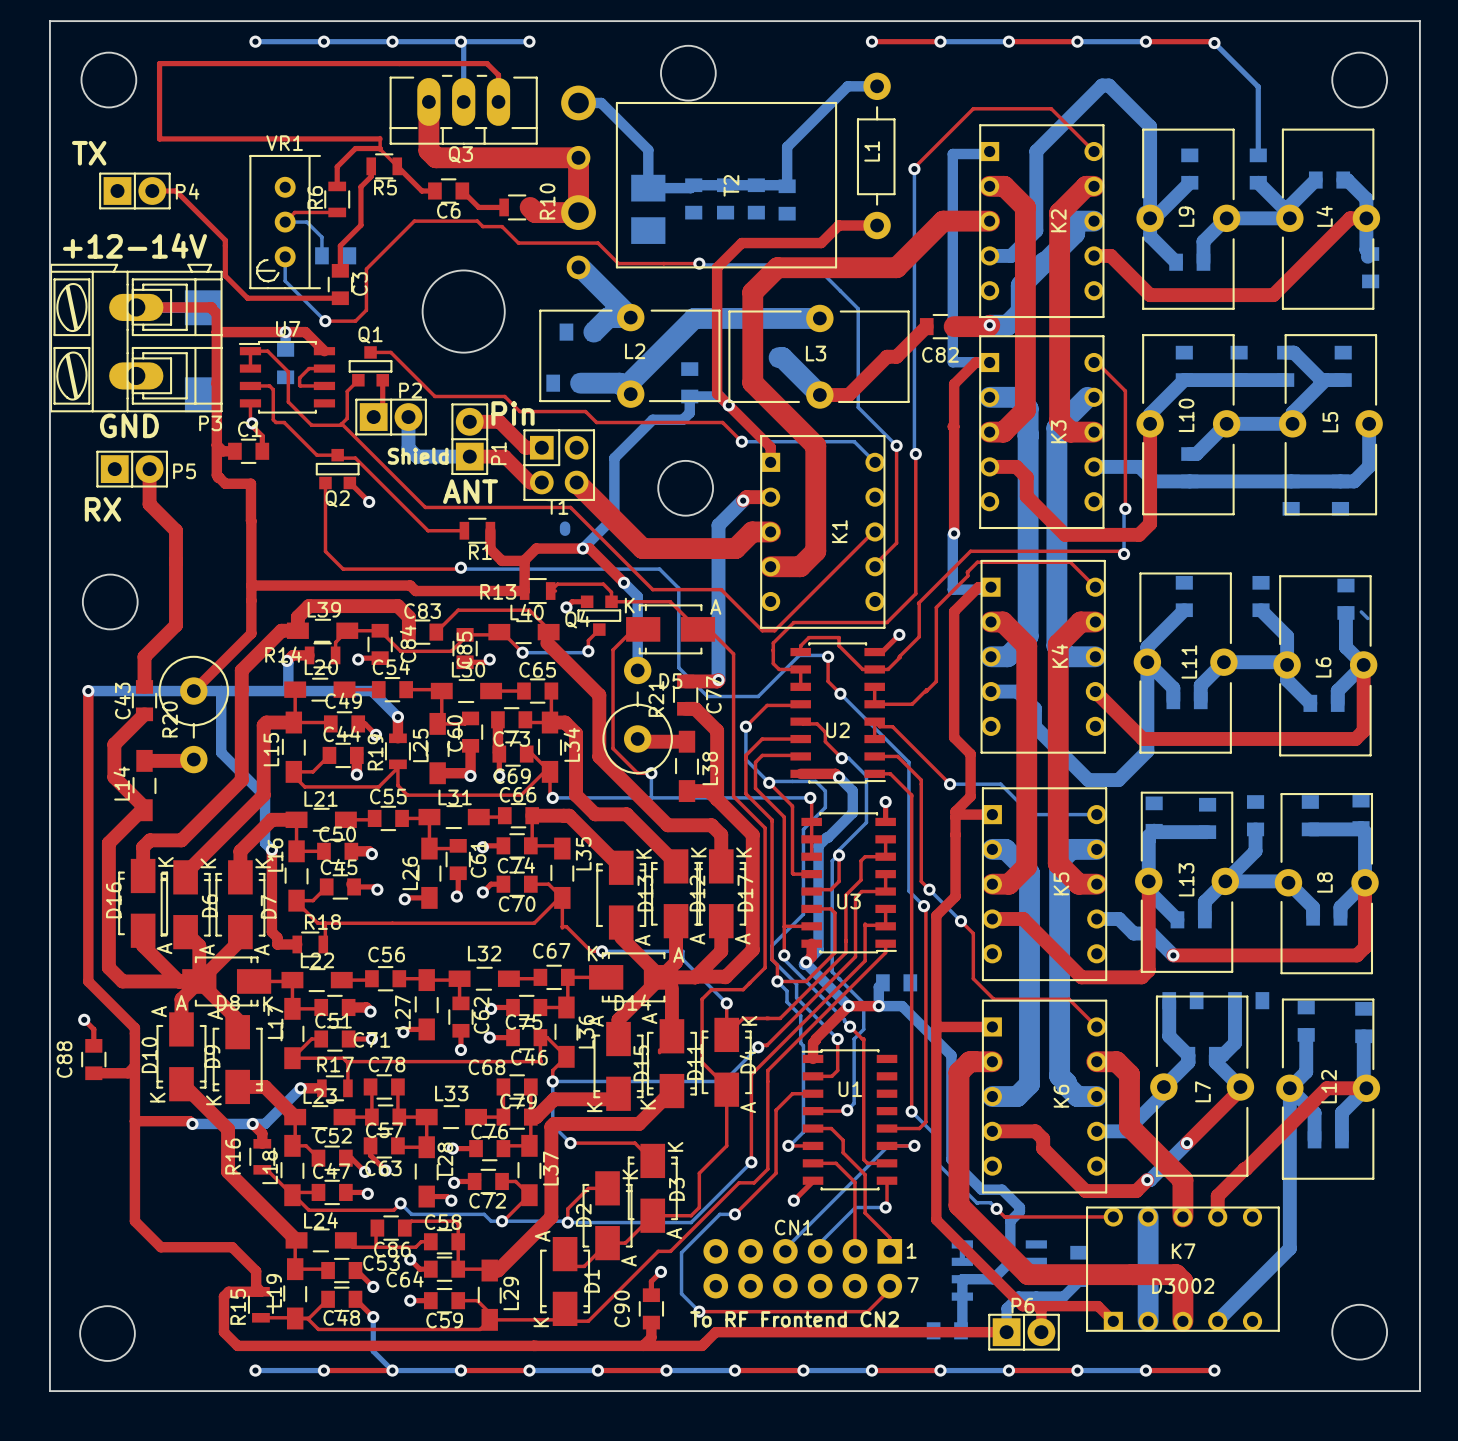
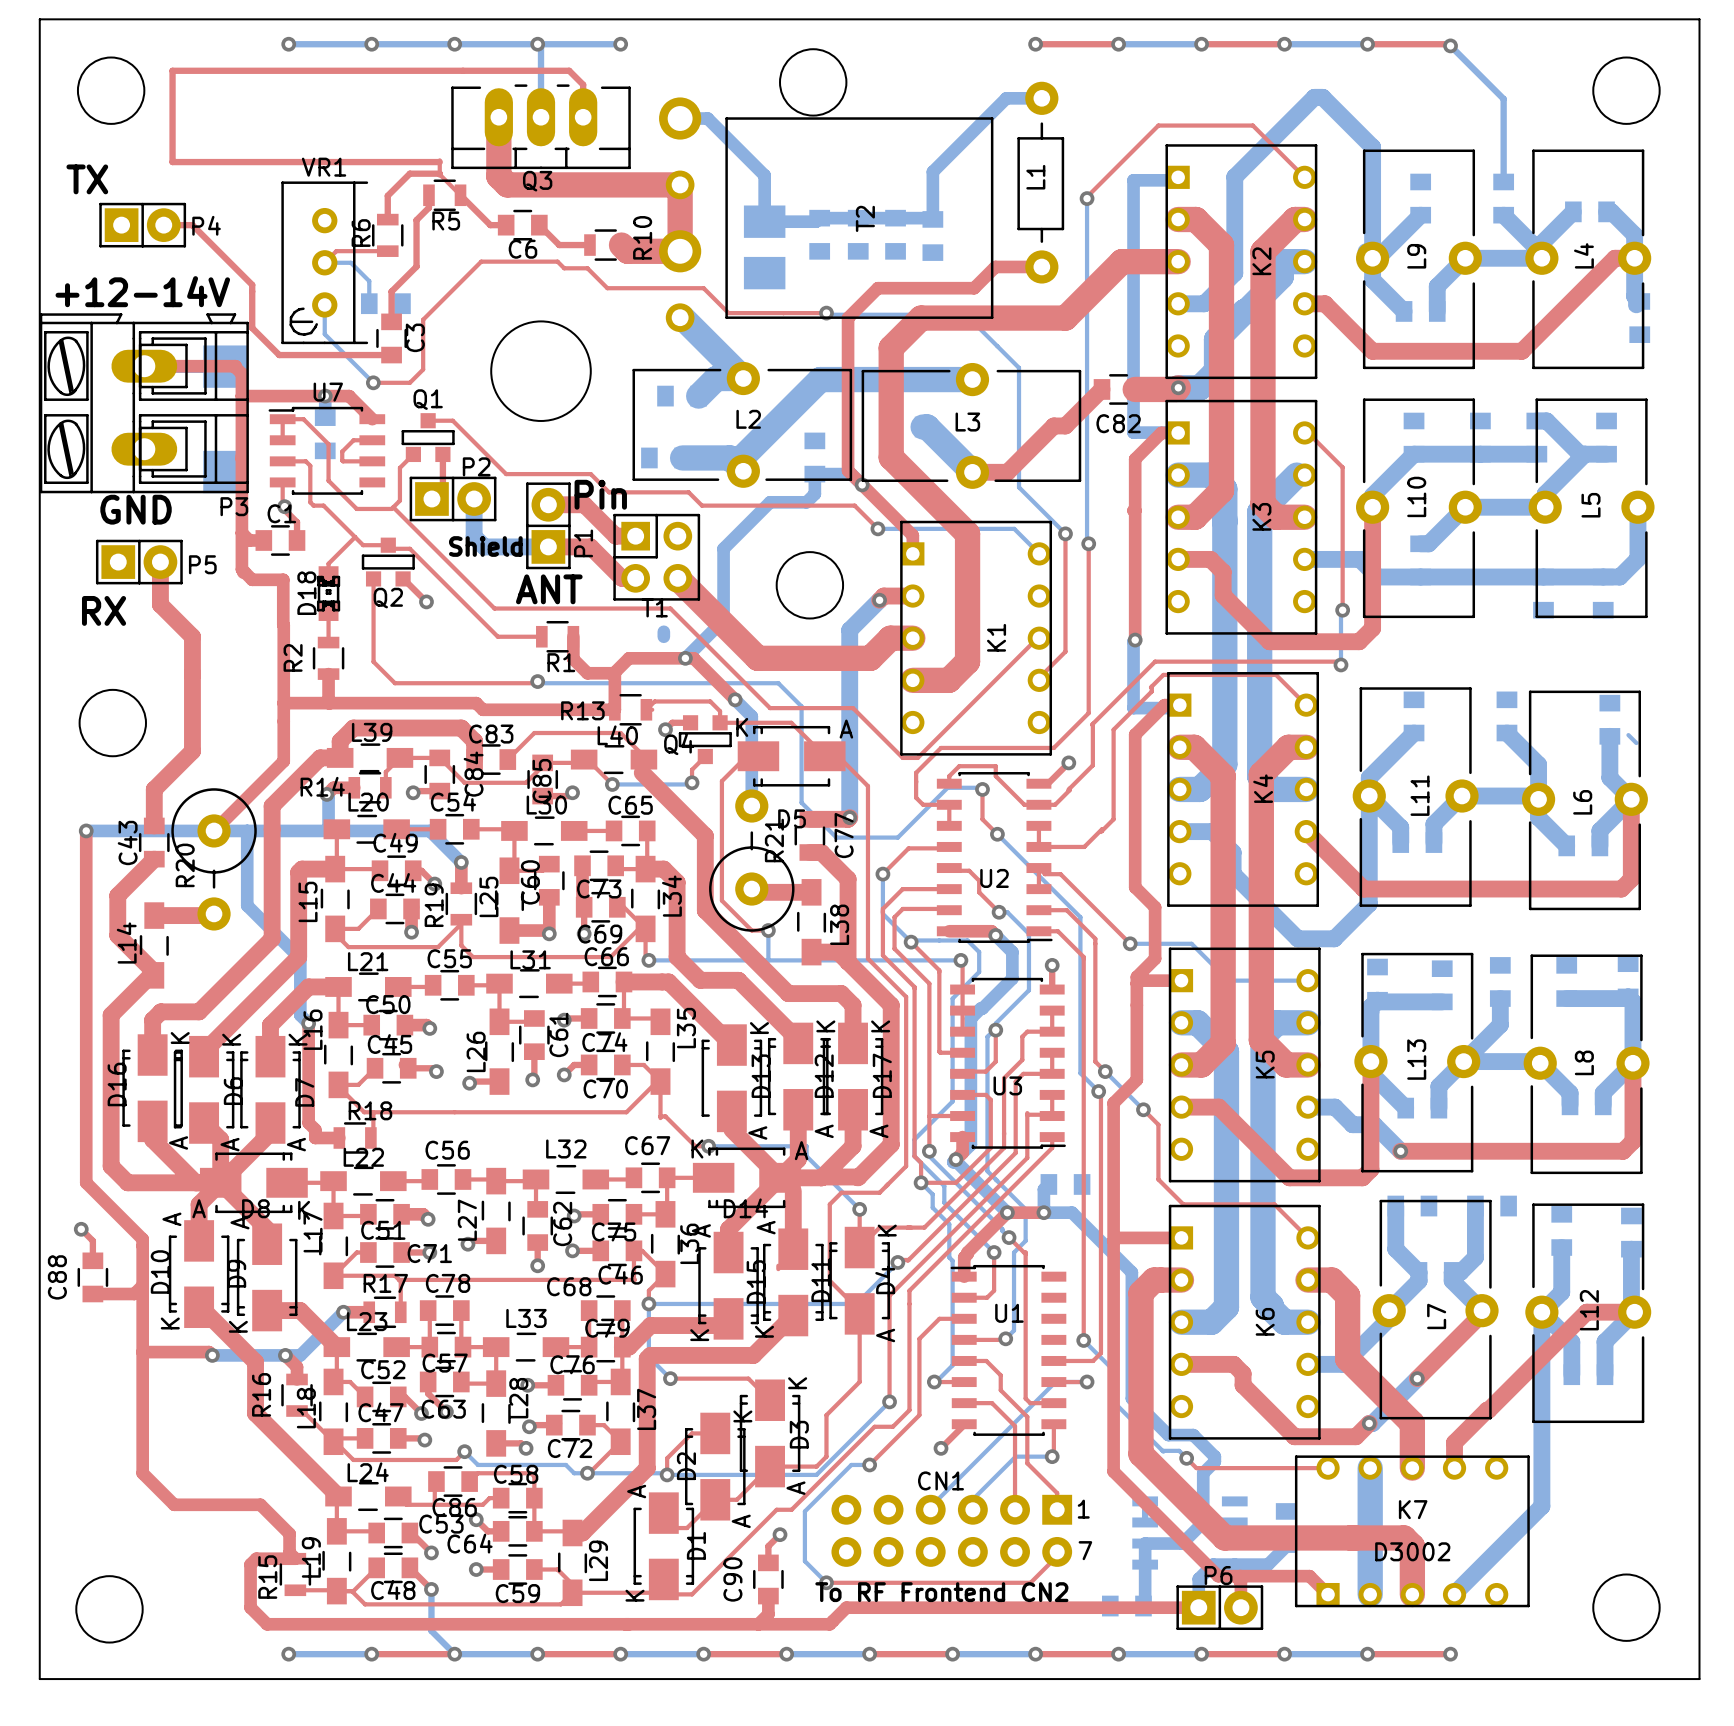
top track: none -> (355, 537) (328, 563) (328, 576)
D18: none -> (328, 593)
top track: none -> (328, 611) (328, 642)
R2: none -> (328, 658)
top track: none -> (328, 674) (328, 703) (330, 701) (330, 703)

